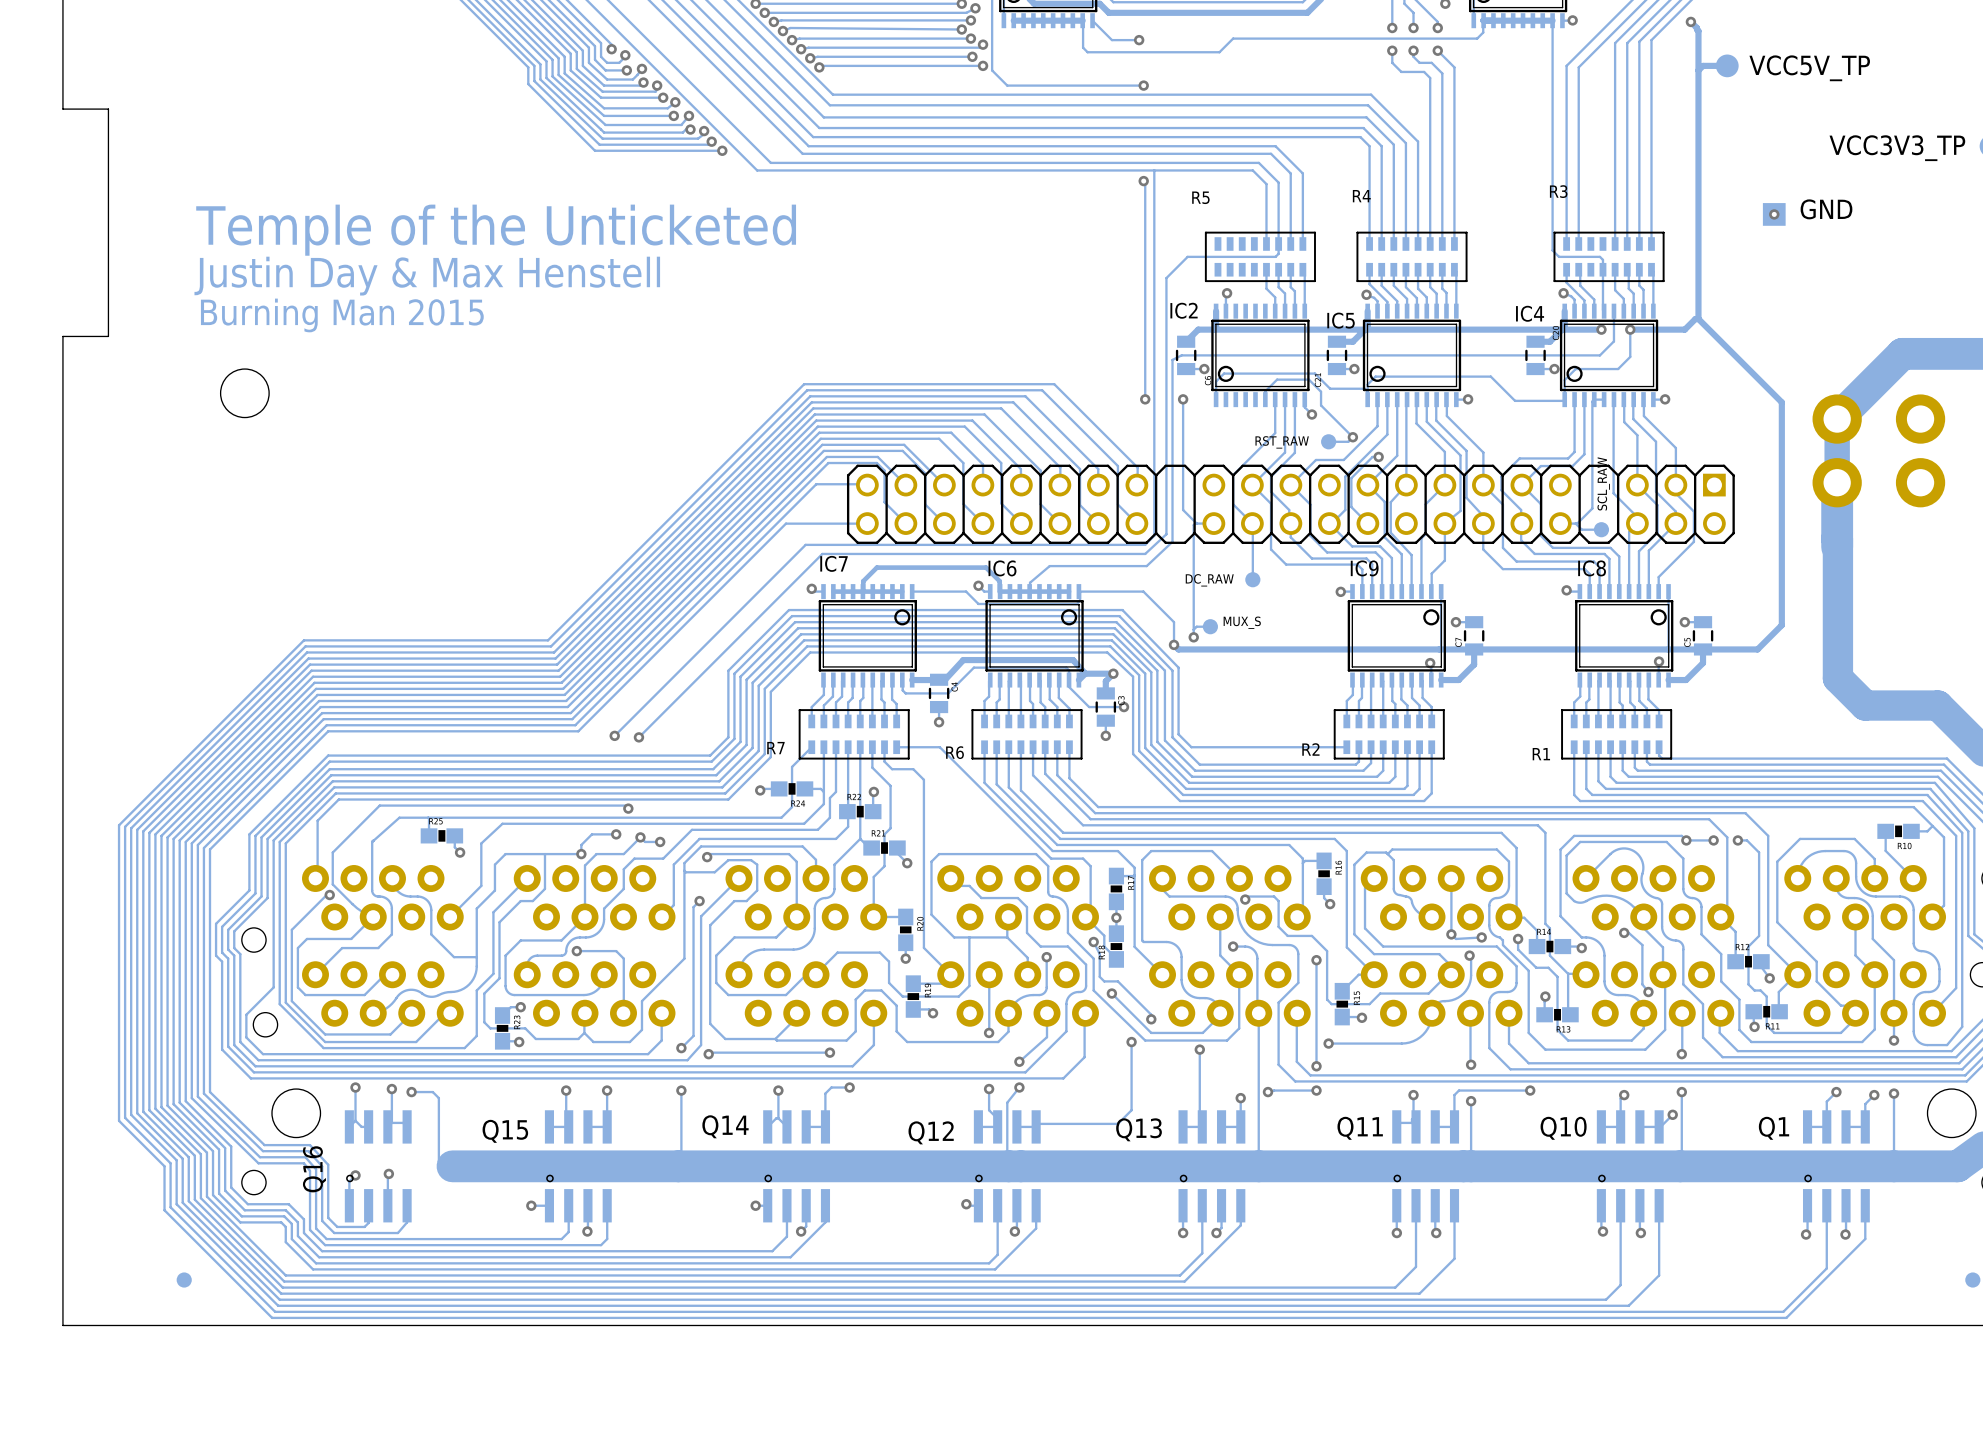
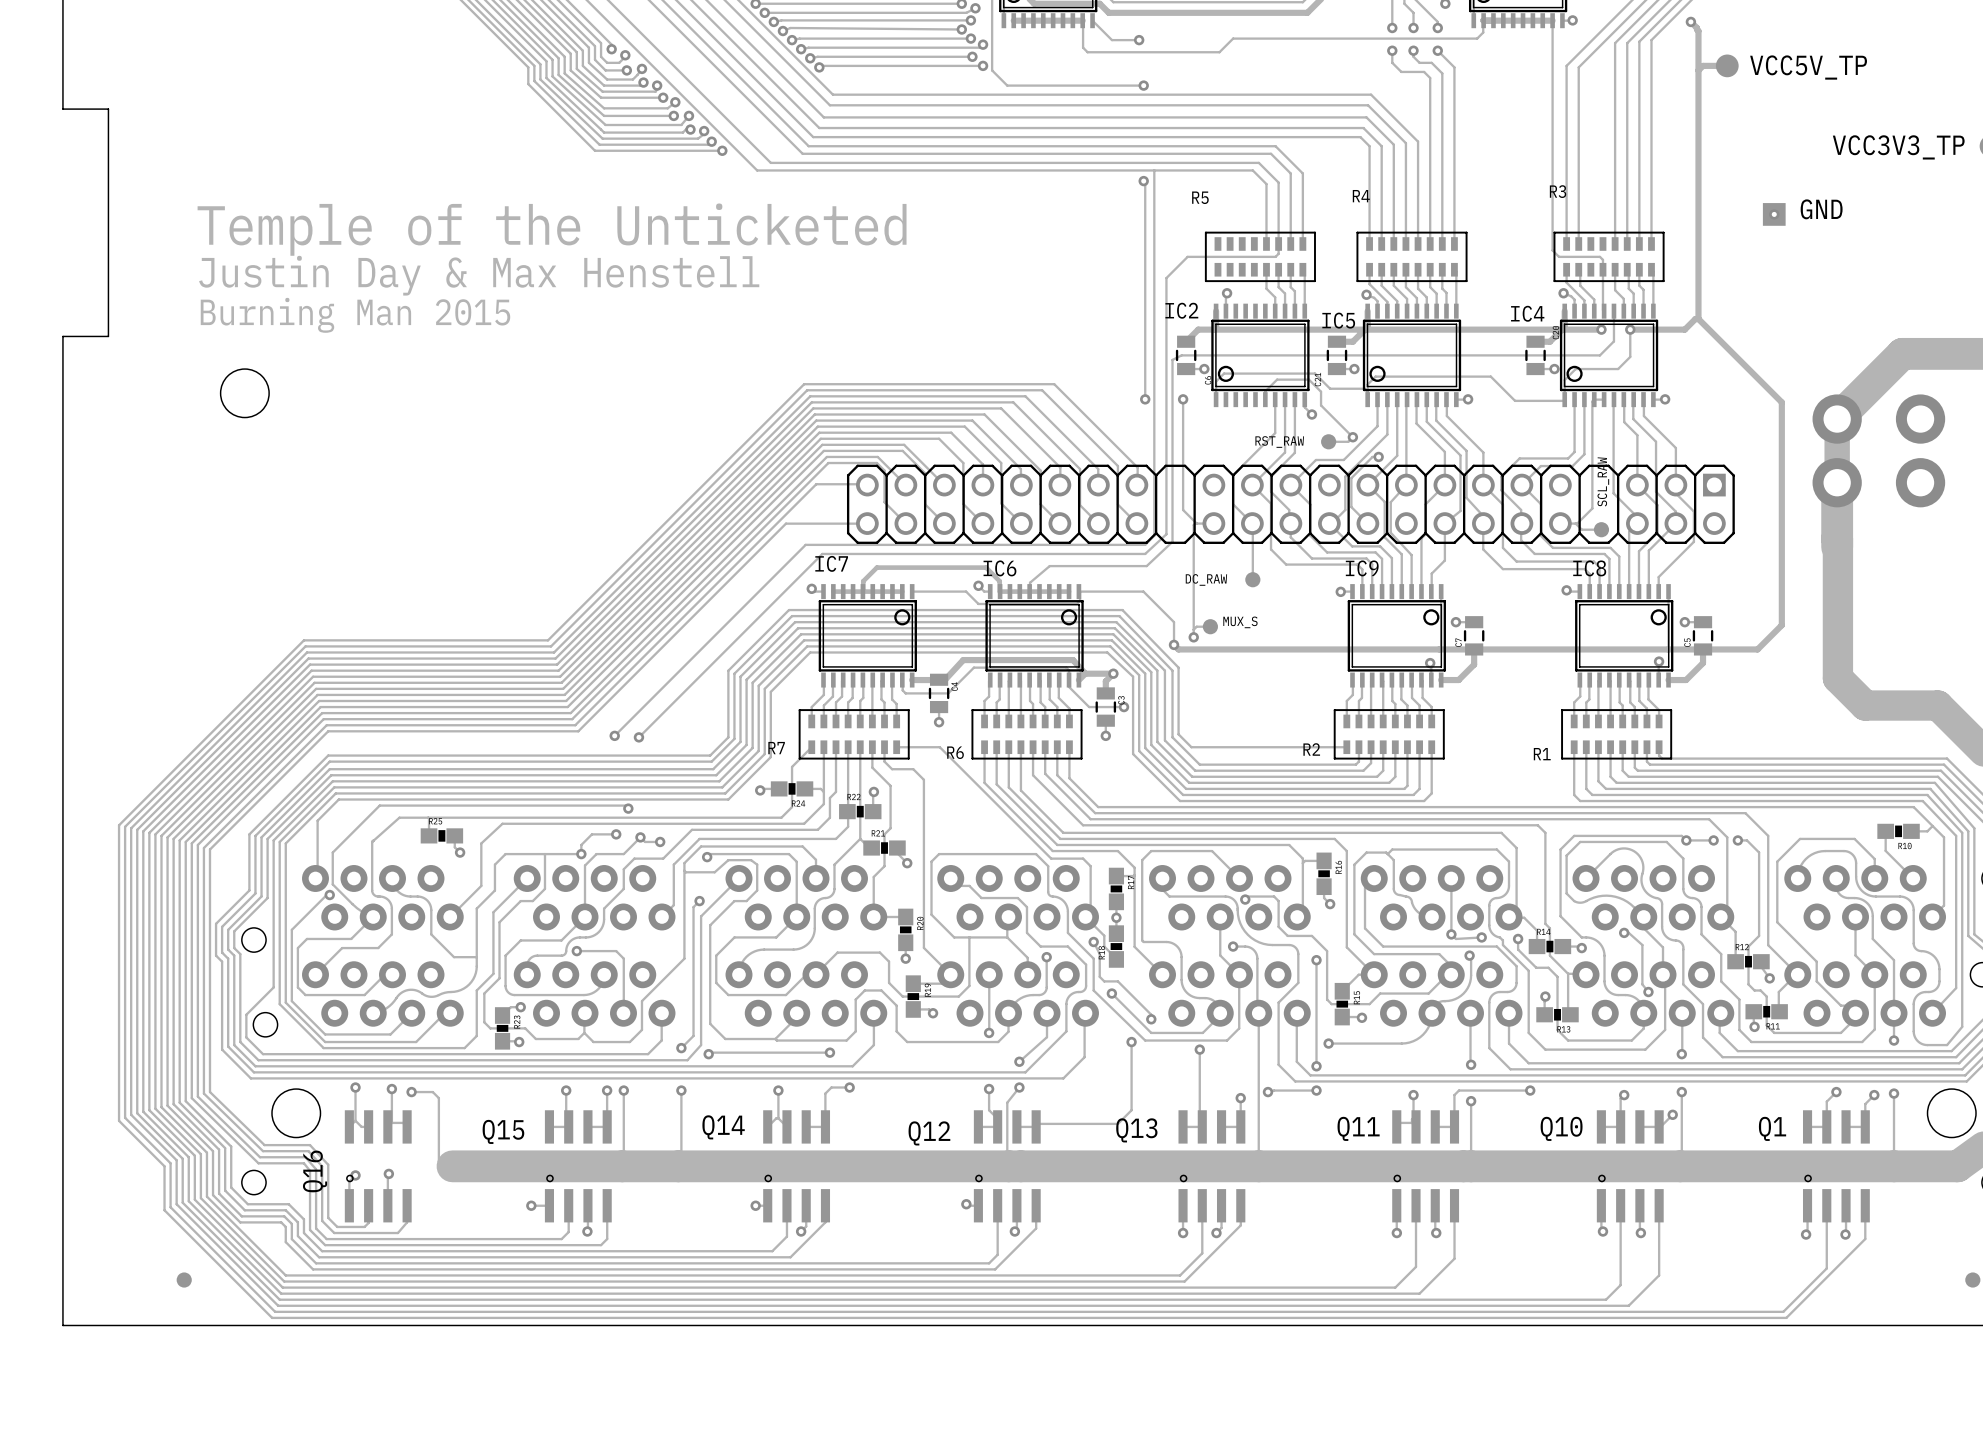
track: none -> (623, 1090) (622, 1166)
via: none -> (623, 1090)

